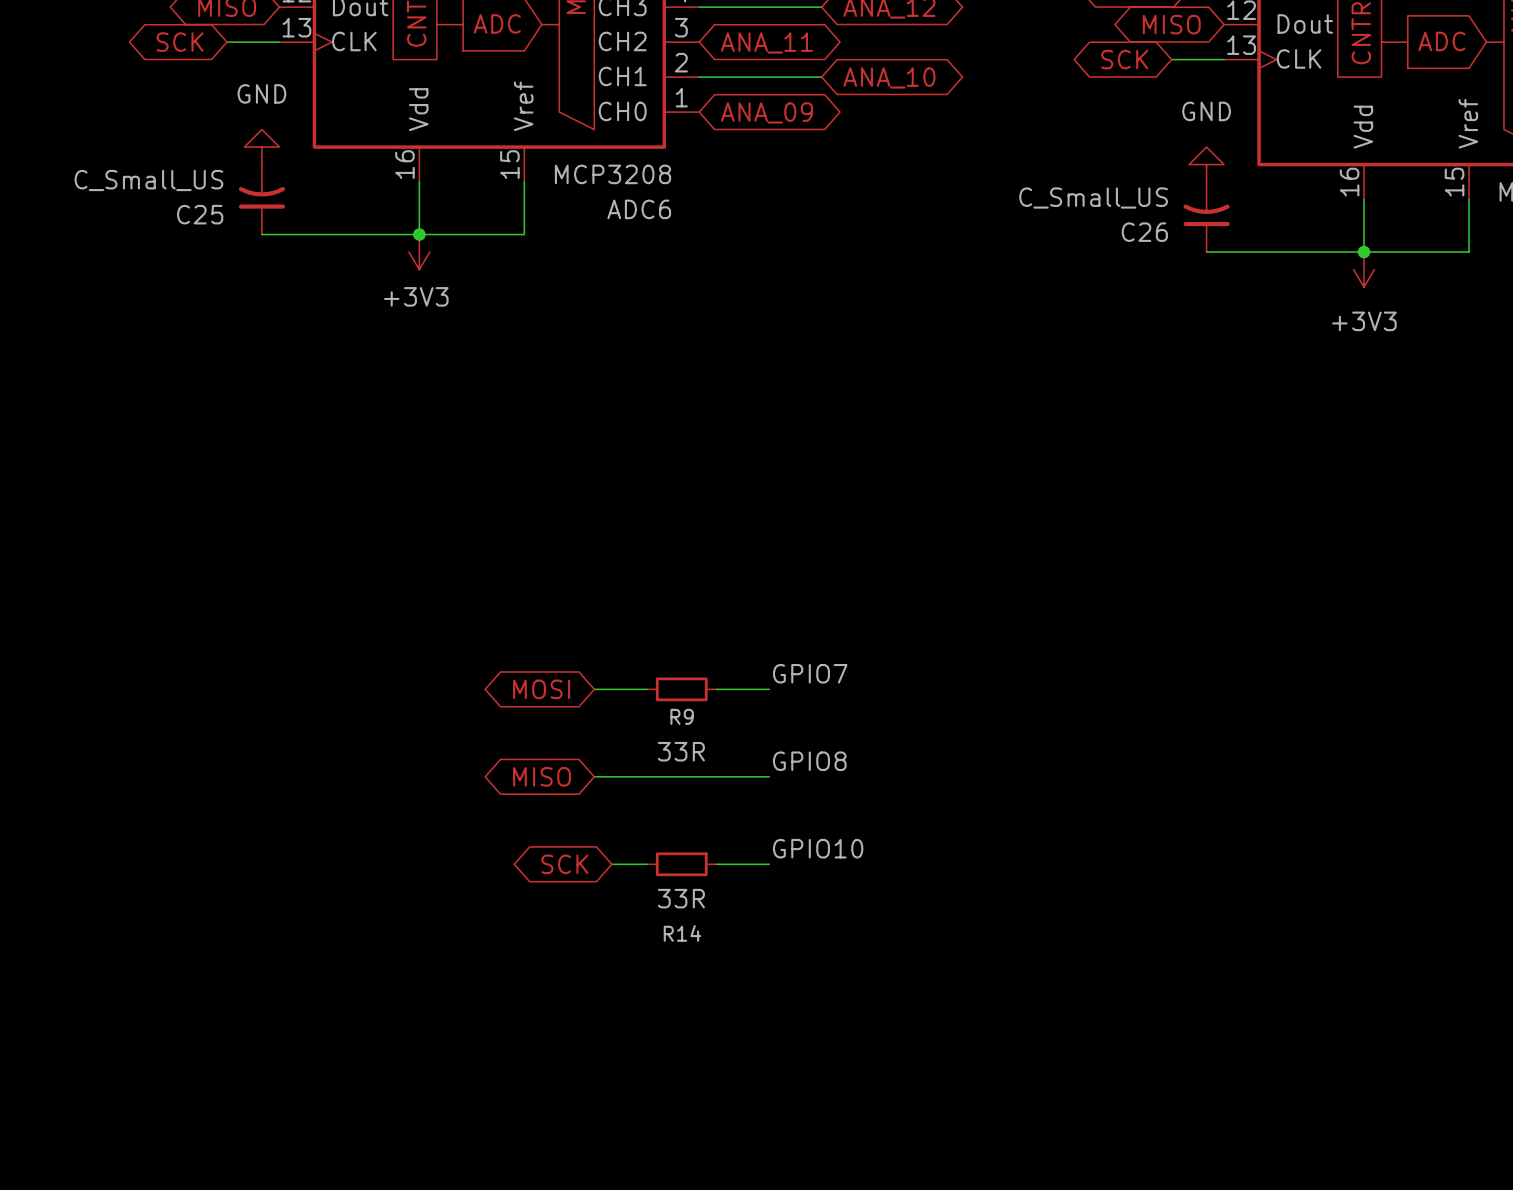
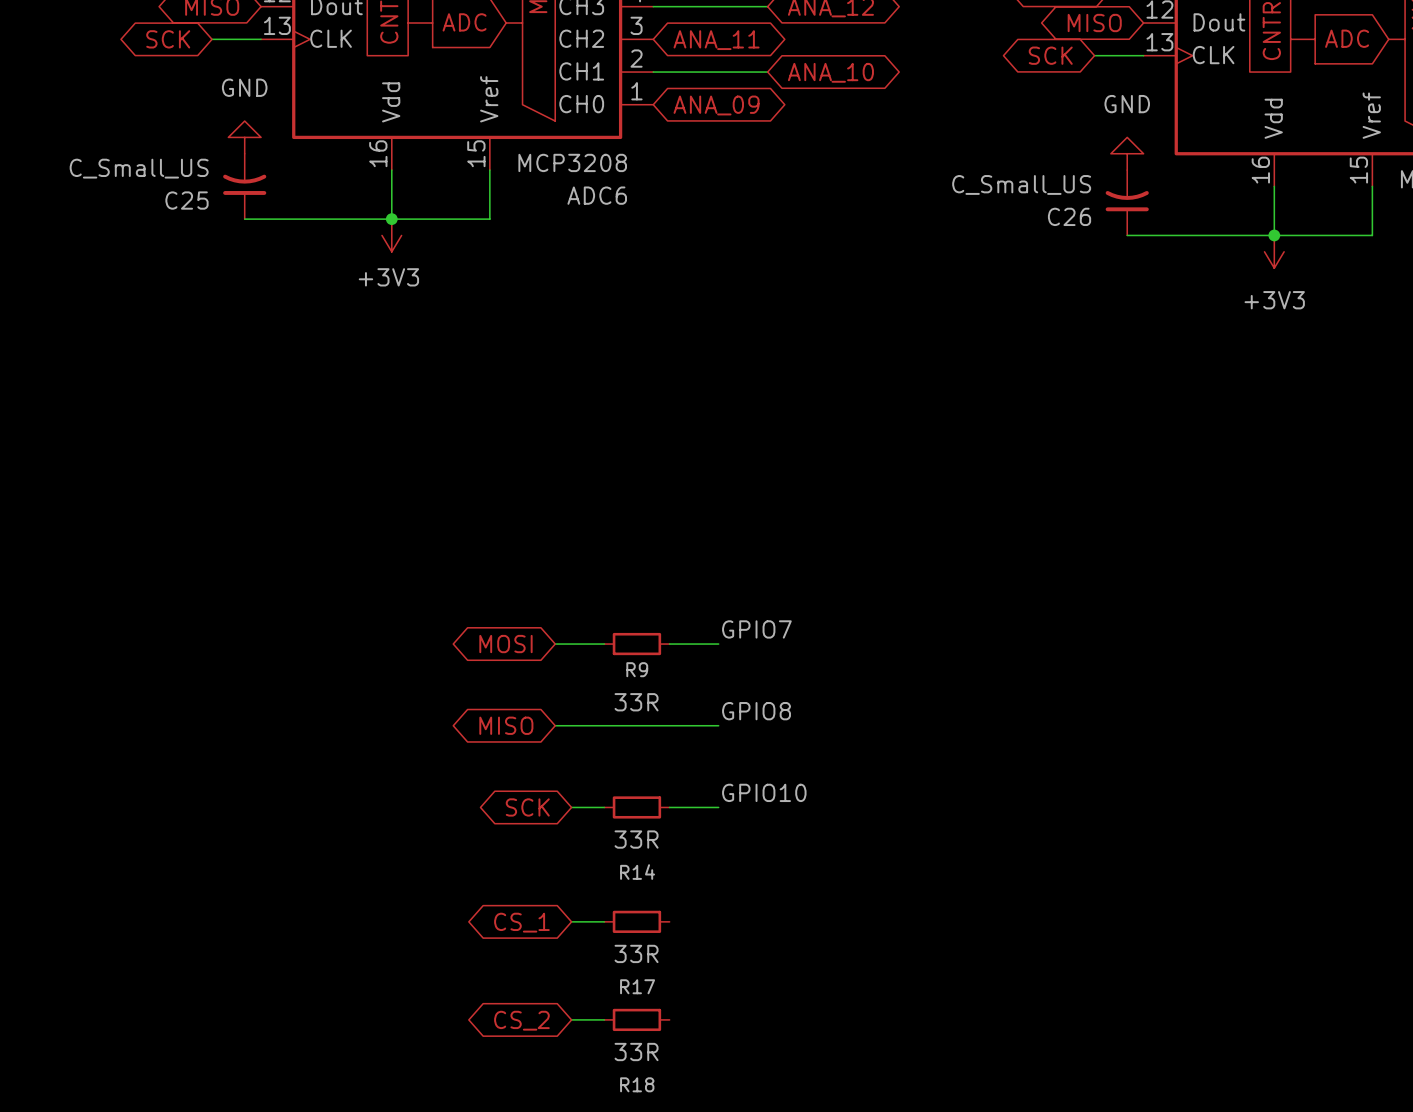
wire: none -> (571, 921) (604, 921)
R17: none -> 33R (636, 921)
global label: none -> CS_1 (521, 922)
wire: none -> (571, 1019) (604, 1019)
R18: none -> 33R (636, 1019)
global label: none -> CS_2 (521, 1020)

